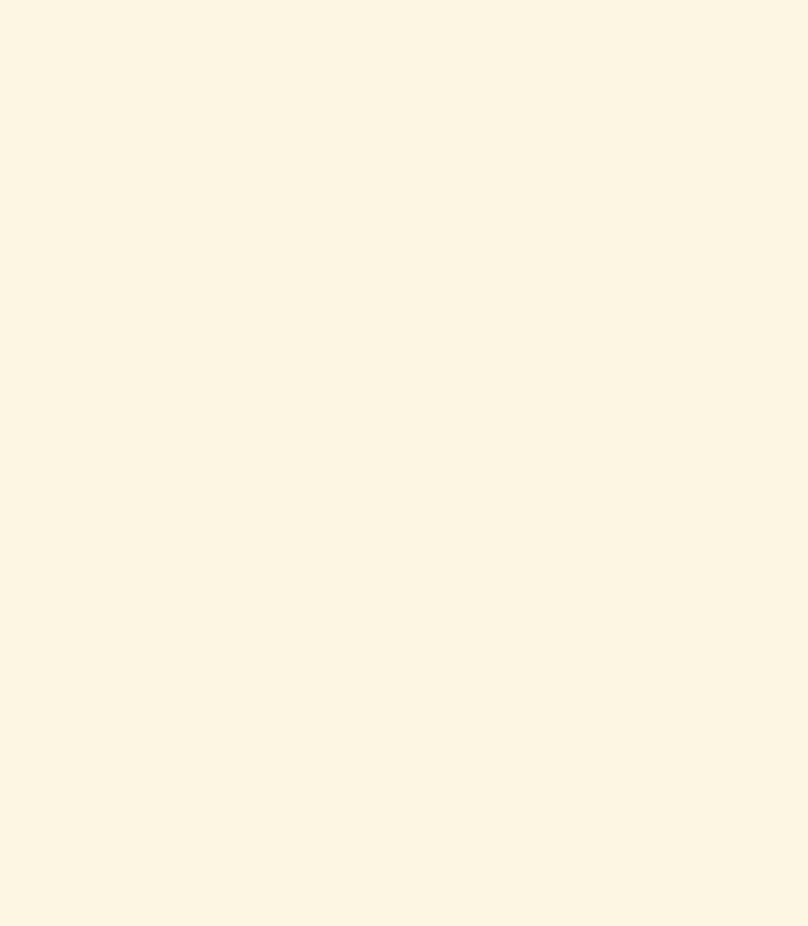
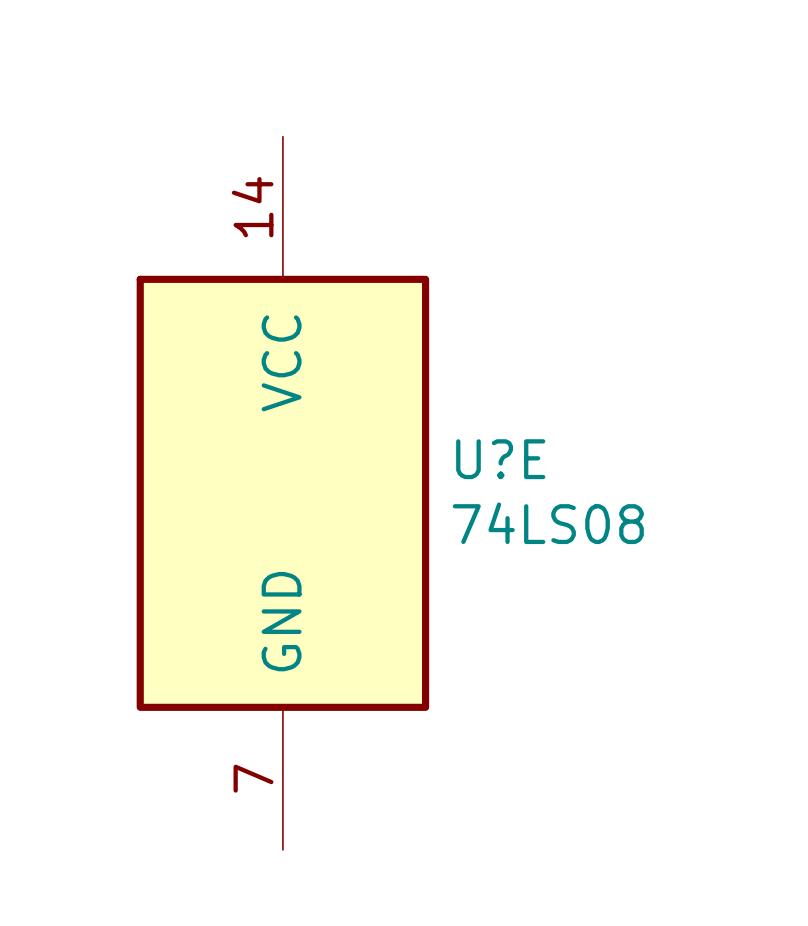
U?E: none -> 74LS08 (282, 493)

